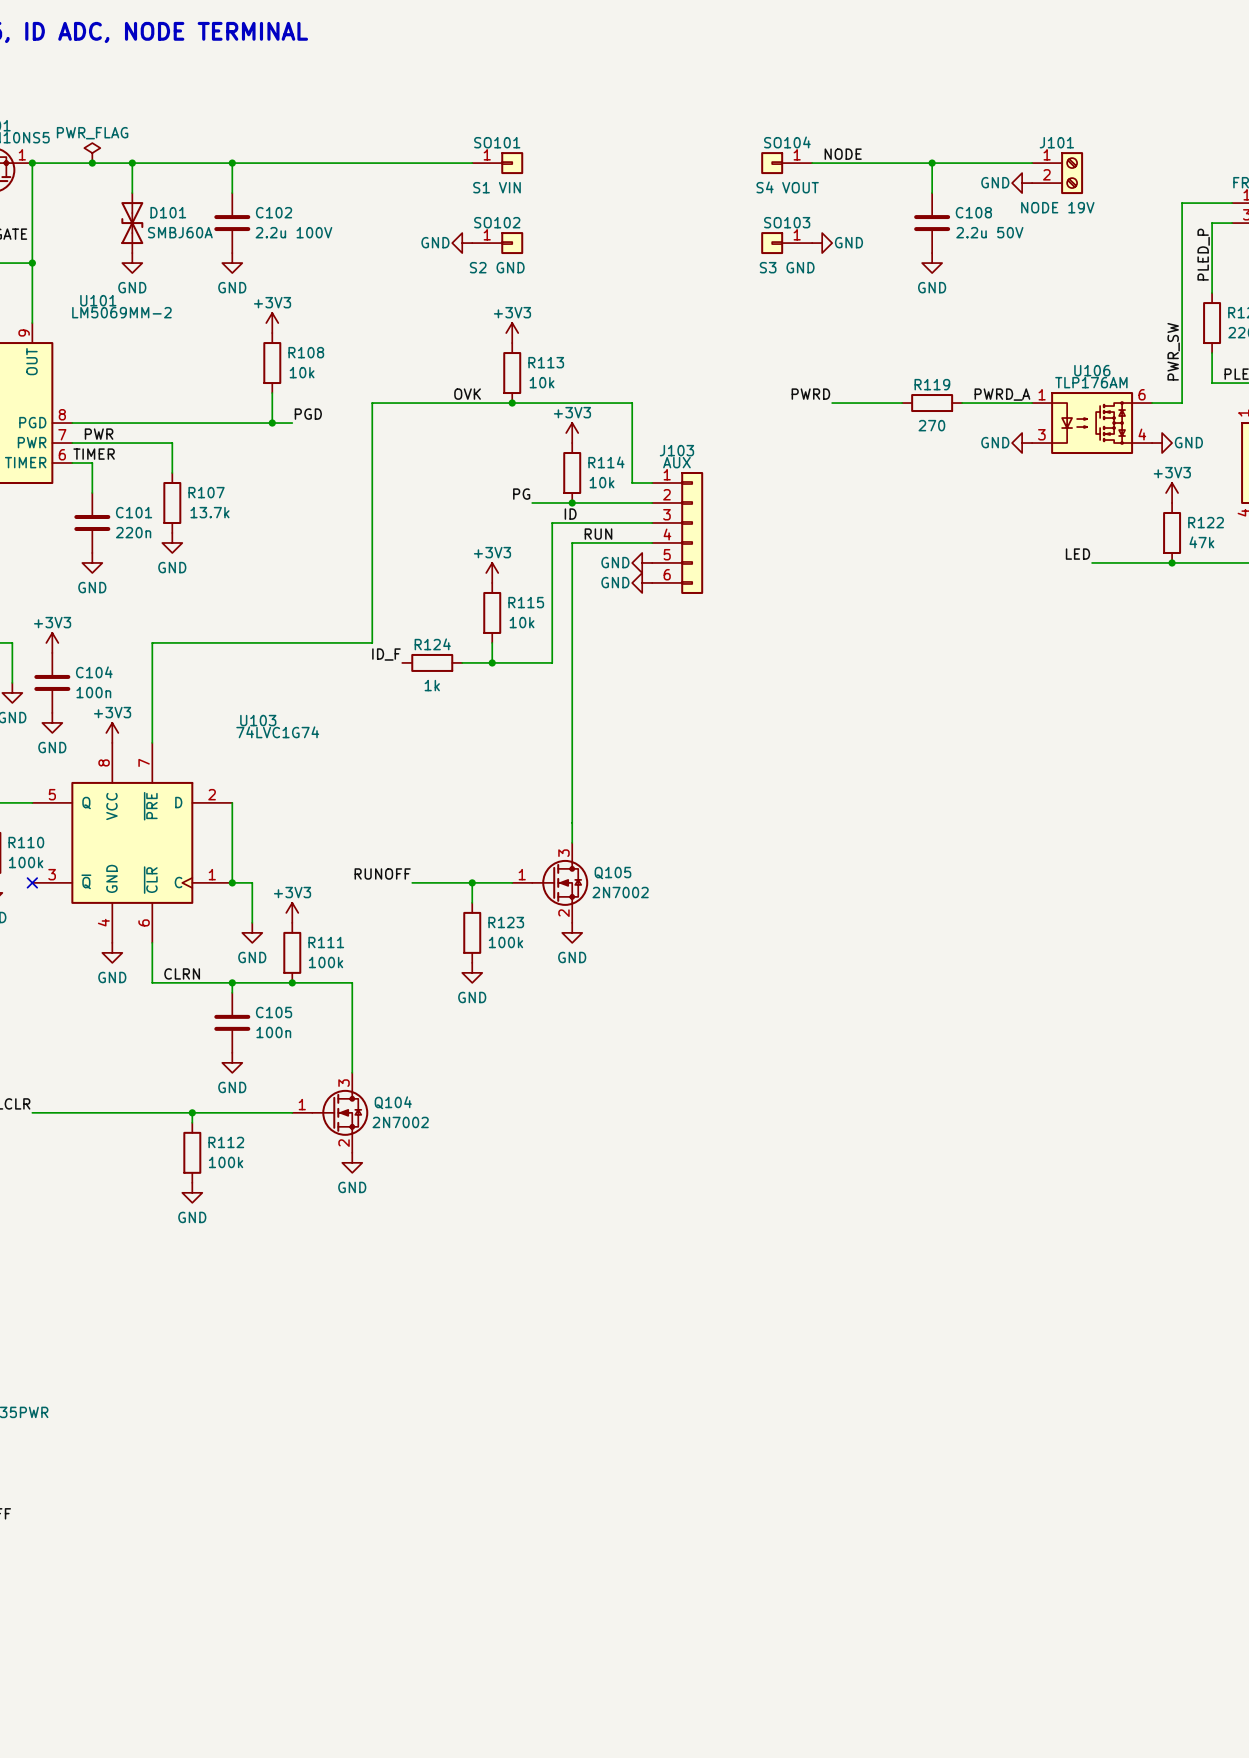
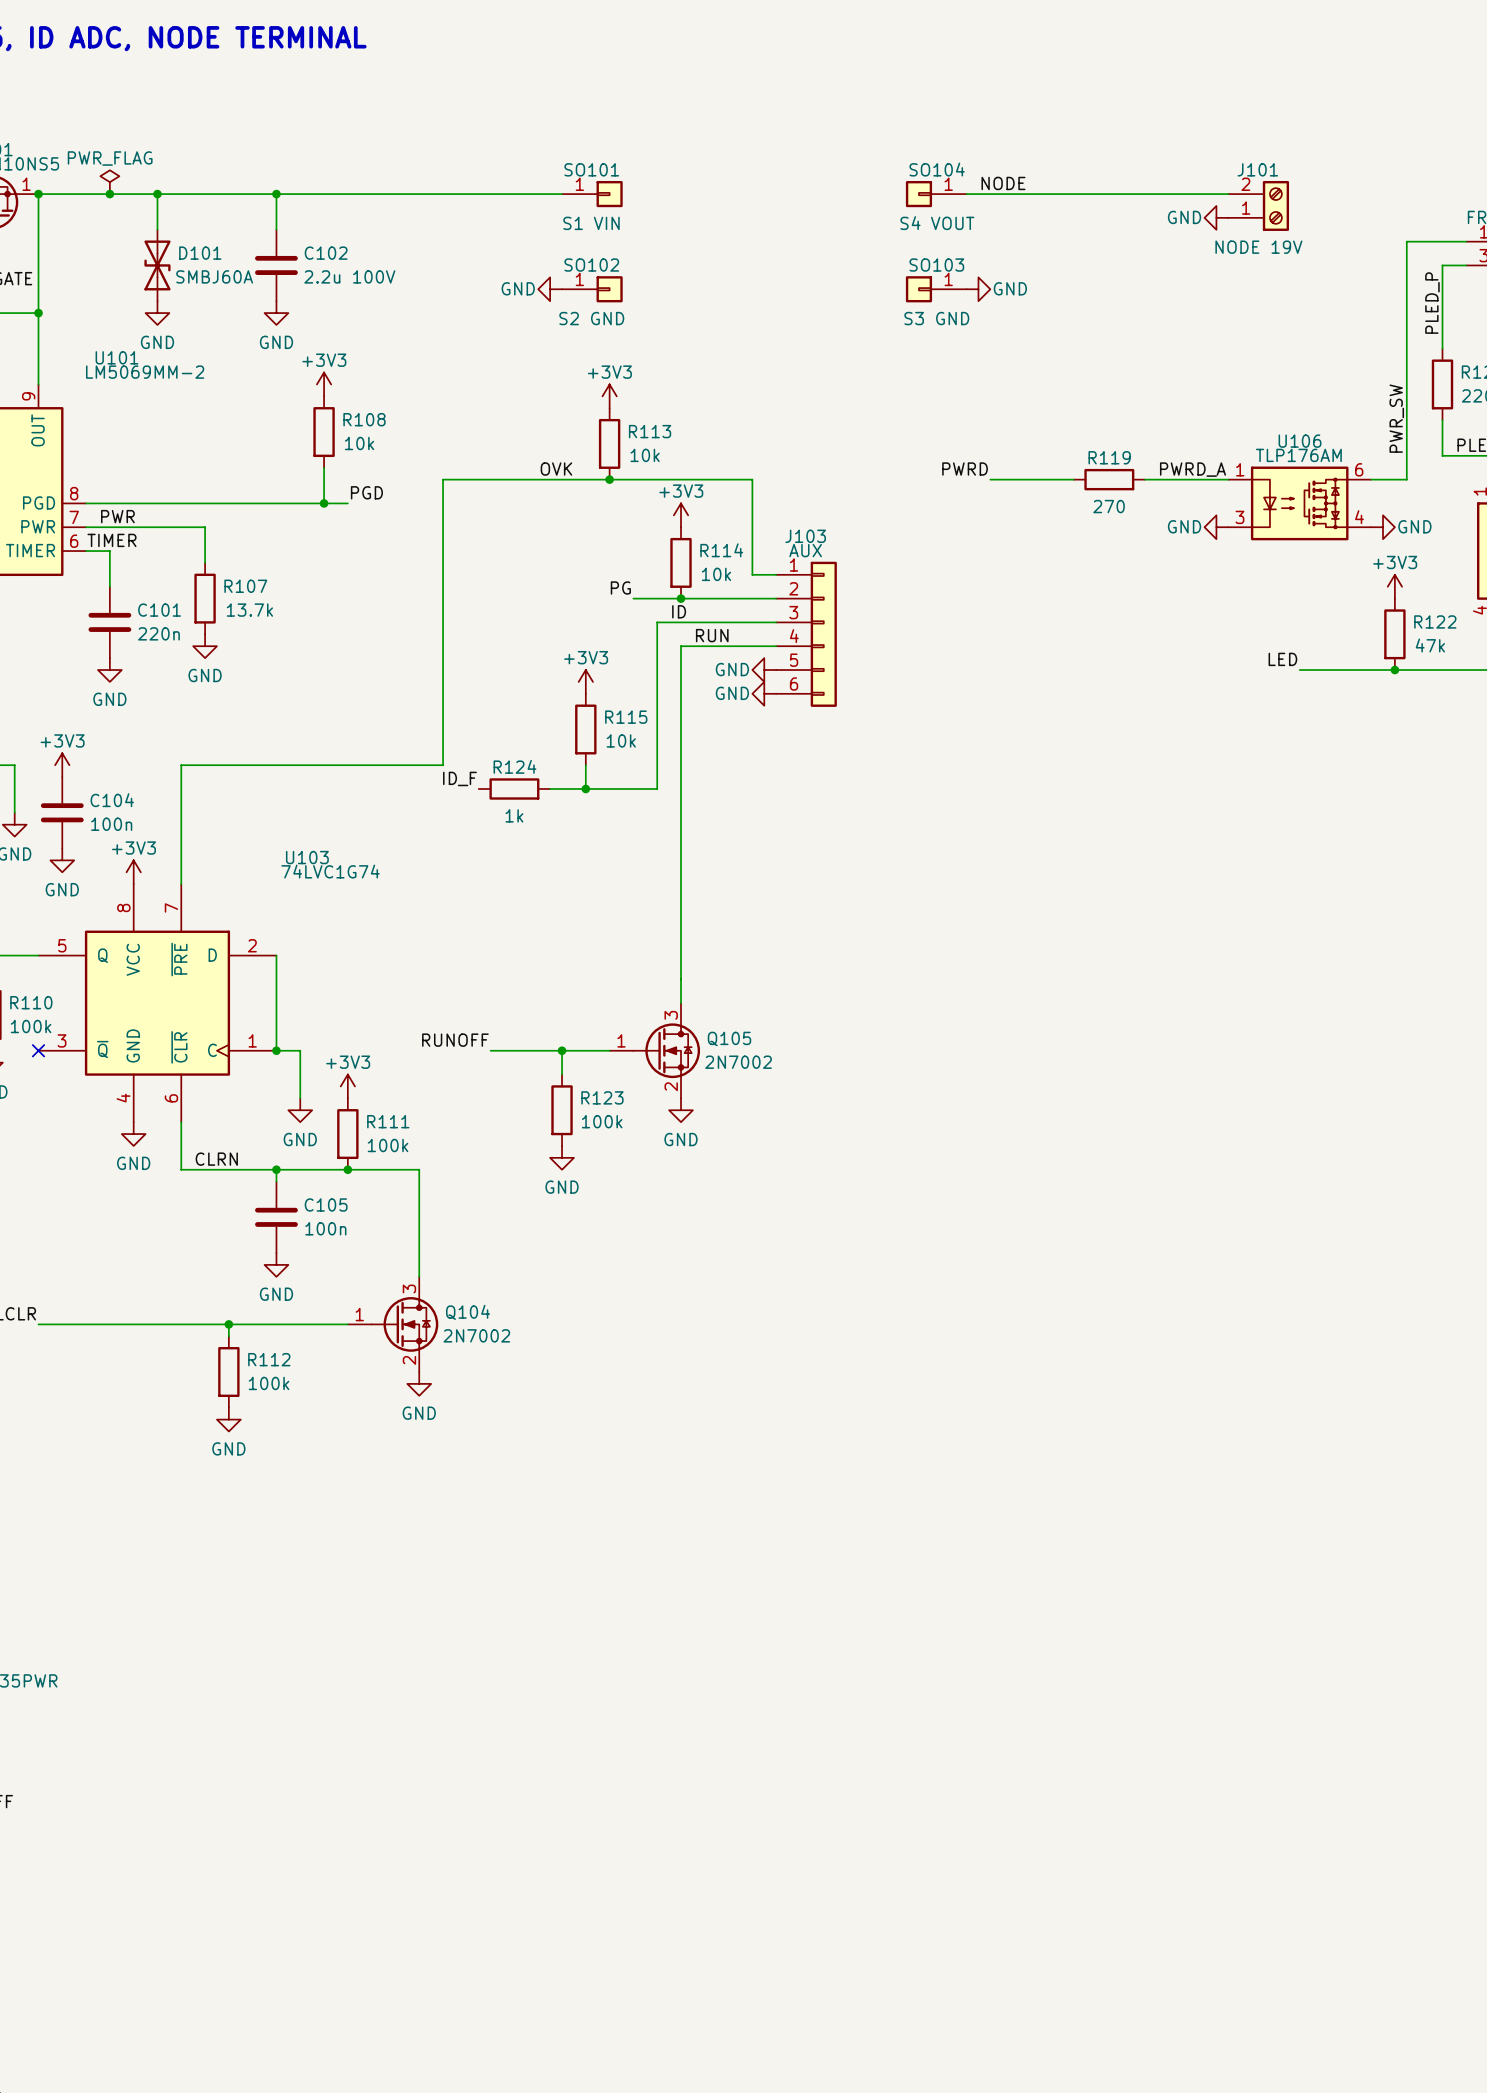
wire: (932, 163) (932, 193) -> none
junction: (932, 163) -> none
J101 flip: as is (1072, 173) -> up-down (1275, 205)
C108: 2.2u 50V (932, 223) -> none
power symbol: GND (932, 263) -> none

